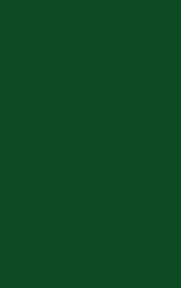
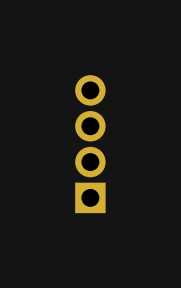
part: none -> (90, 144)

